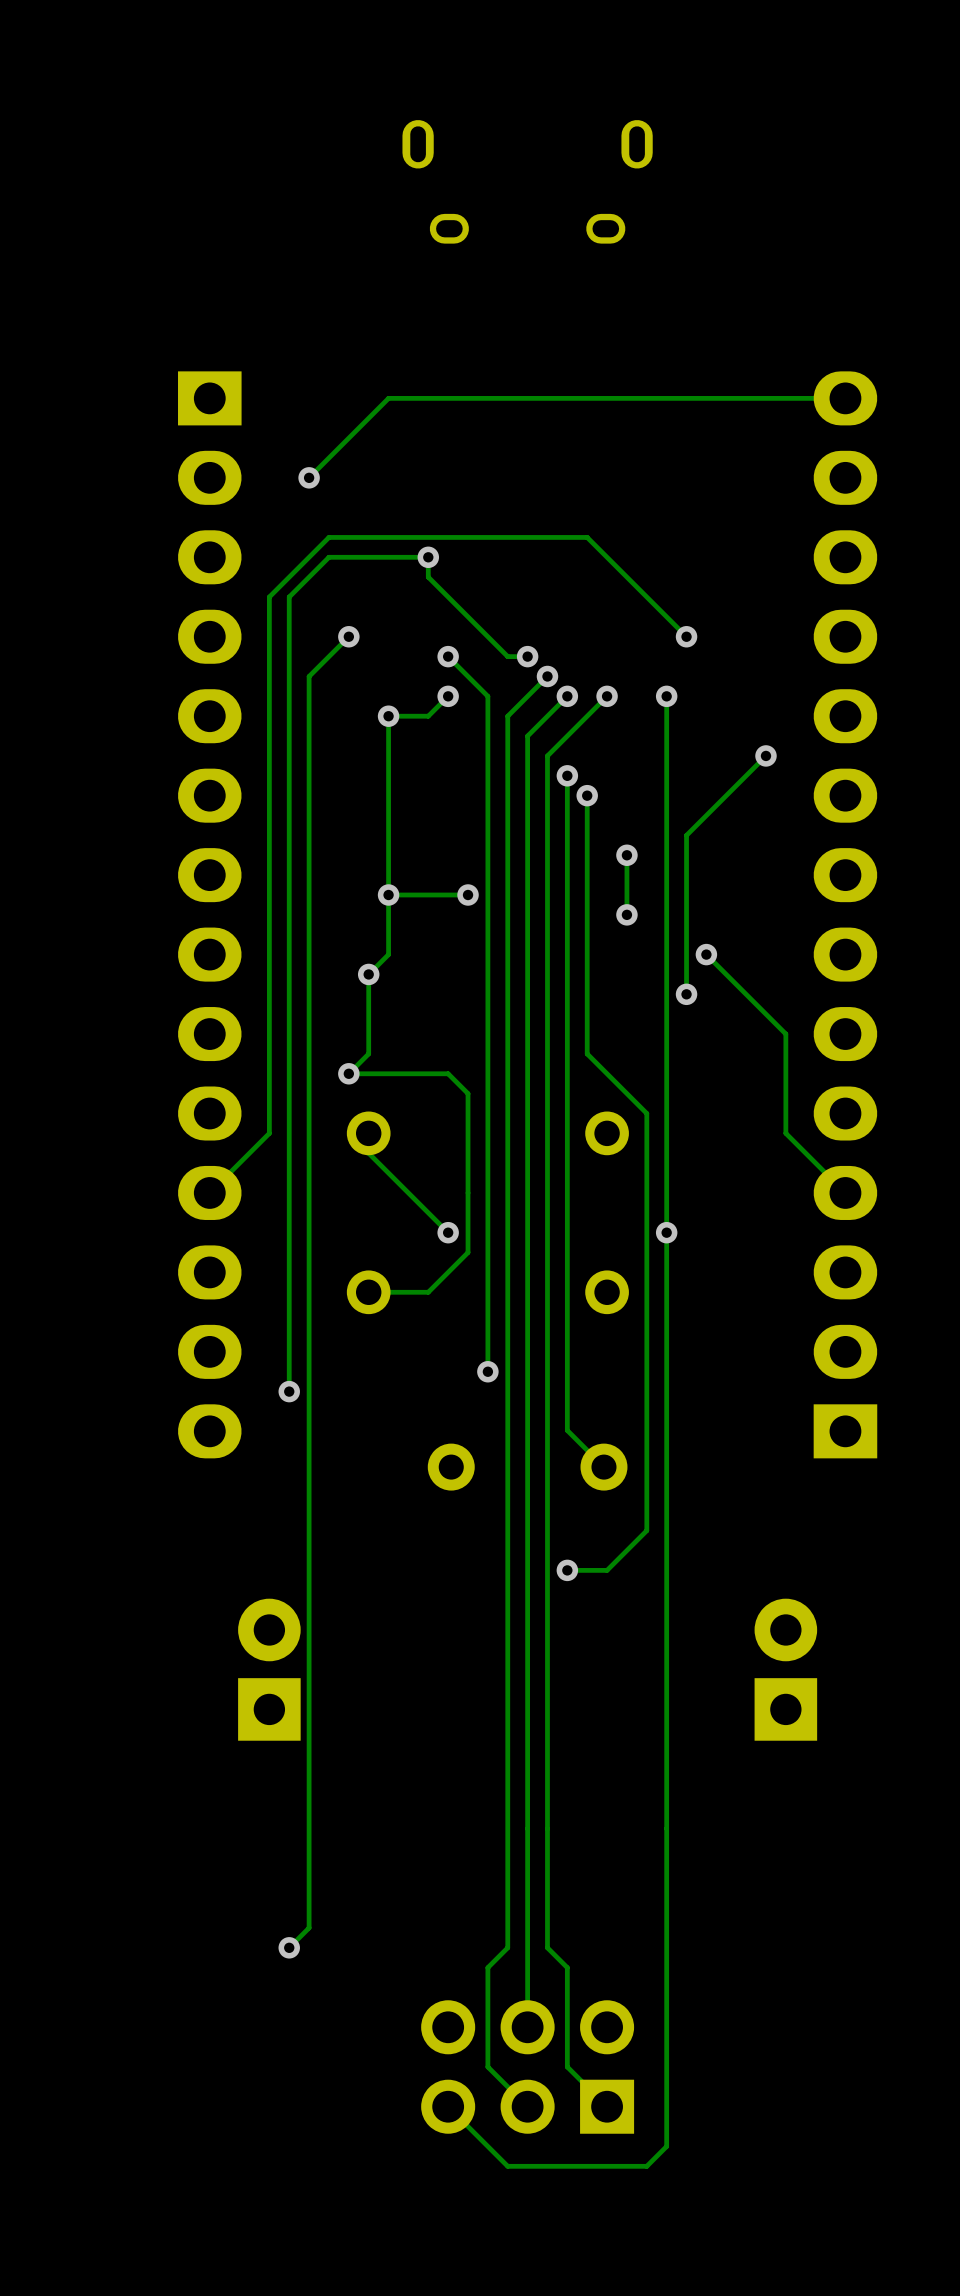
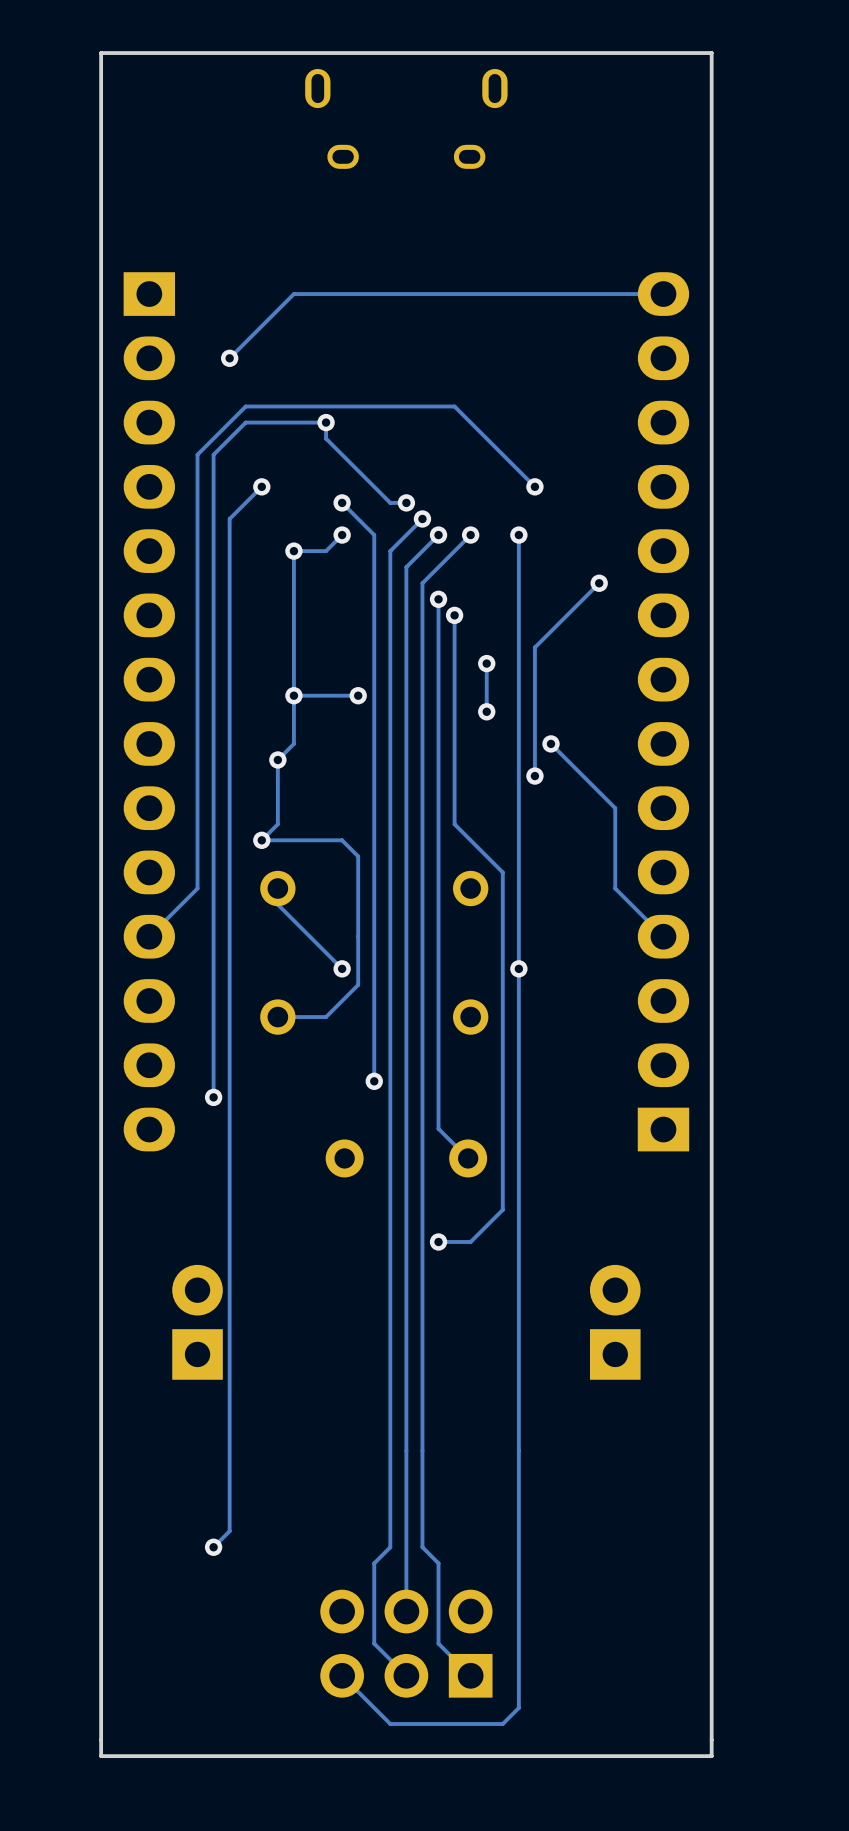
board edge: none -> (711, 53) (711, 1756) (101, 1756) (101, 53) (711, 53)

